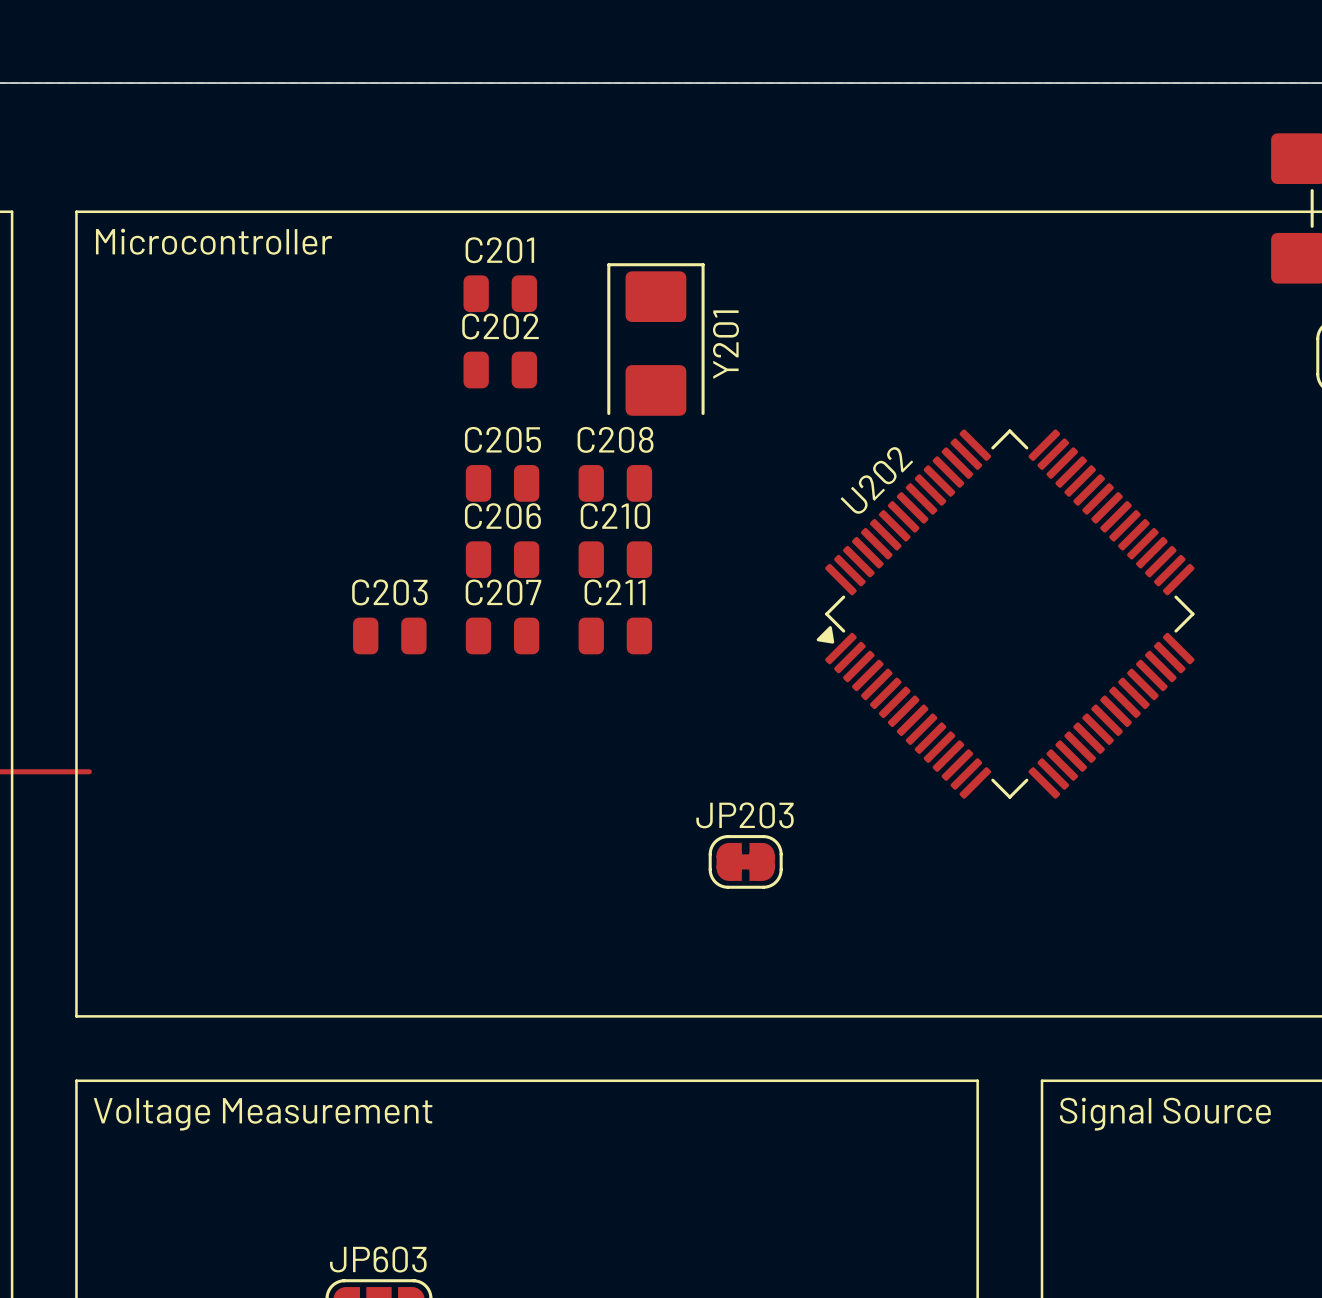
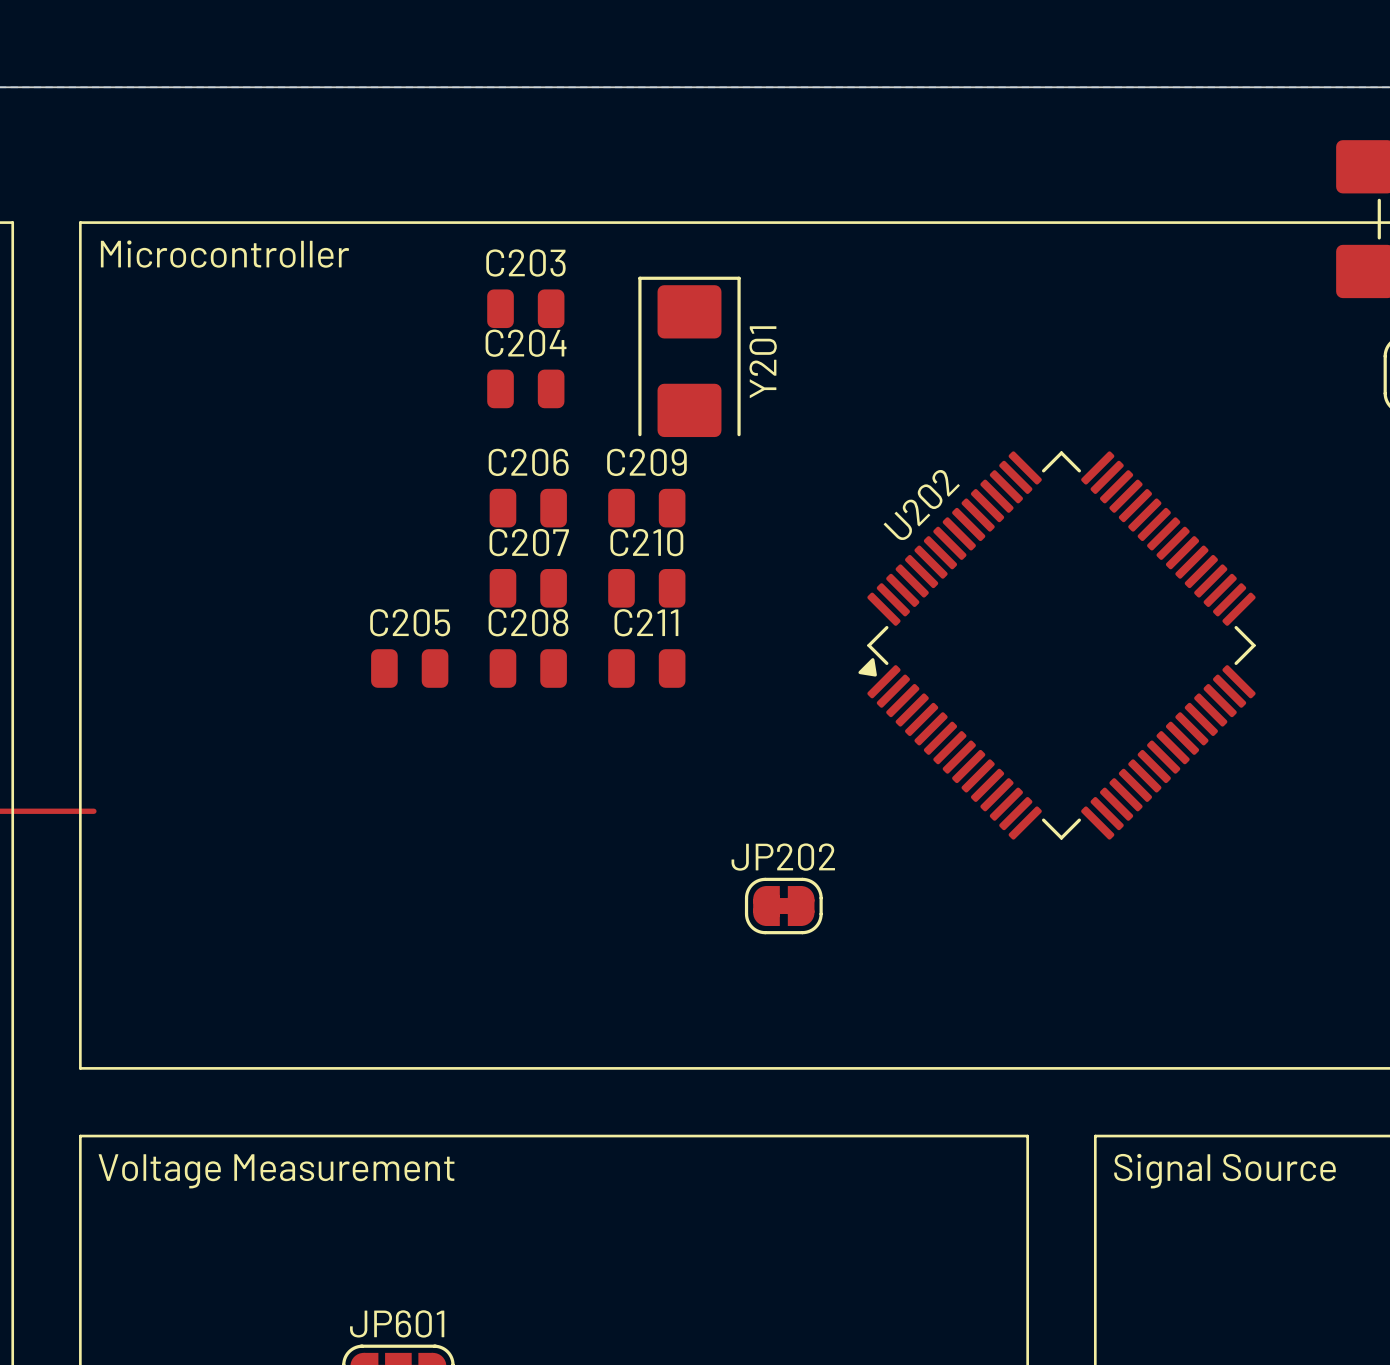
C201 name: C201 (499, 250) -> C203 (525, 263)
C202 name: C202 (500, 326) -> C204 (526, 343)
C205 name: C205 (502, 439) -> C206 (528, 462)
C208 name: C208 (615, 439) -> C209 (646, 462)
C206 name: C206 (502, 516) -> C207 (529, 542)
C203 name: C203 (389, 592) -> C205 (410, 622)
C207 name: C207 (503, 592) -> C208 (528, 622)
JP203 name: JP203 (745, 815) -> JP202 (783, 857)
JP603 name: JP603 (378, 1259) -> JP601 (397, 1323)

